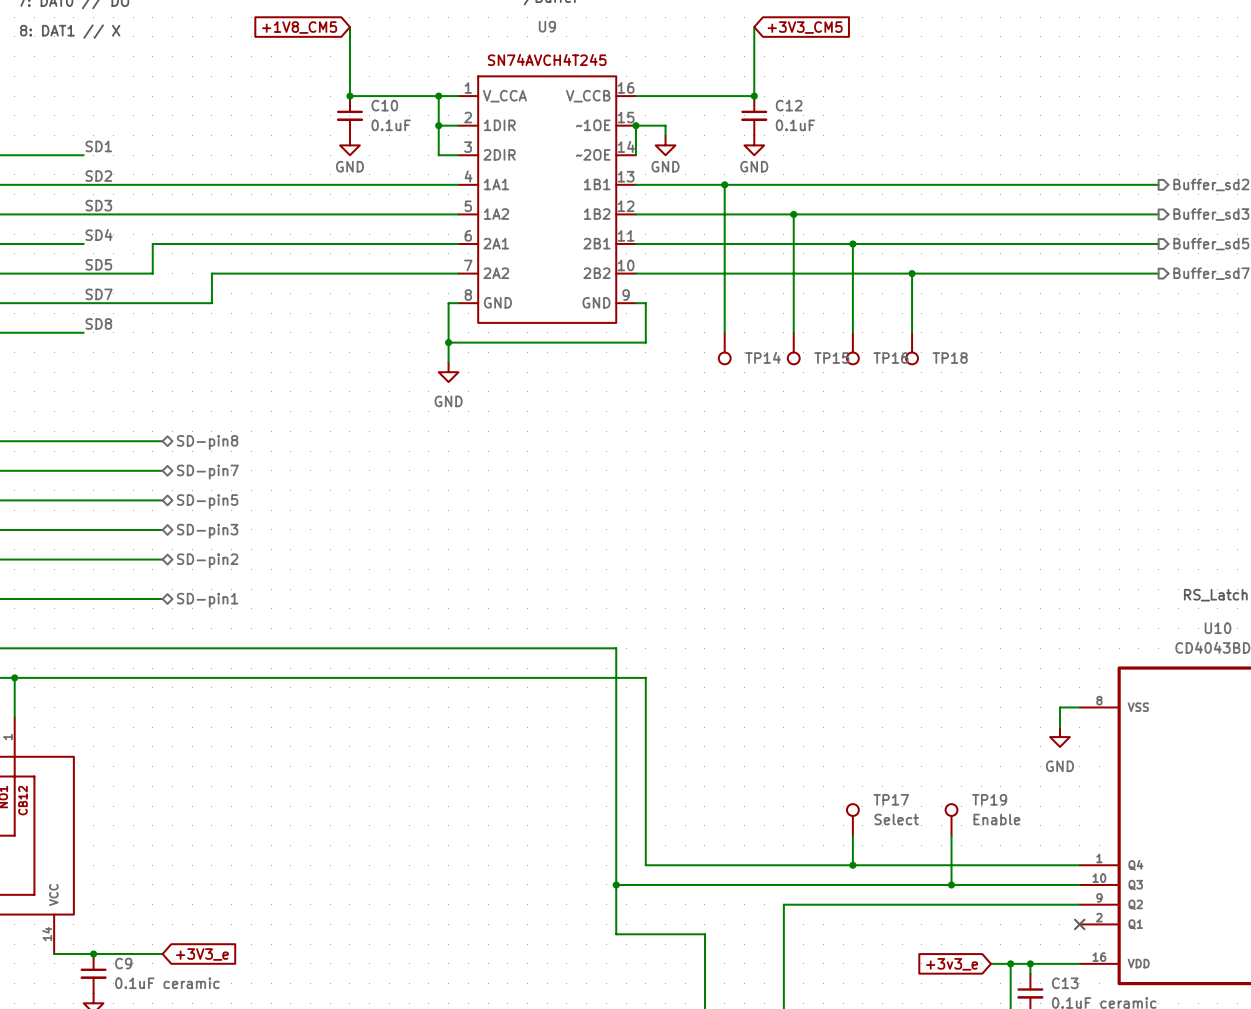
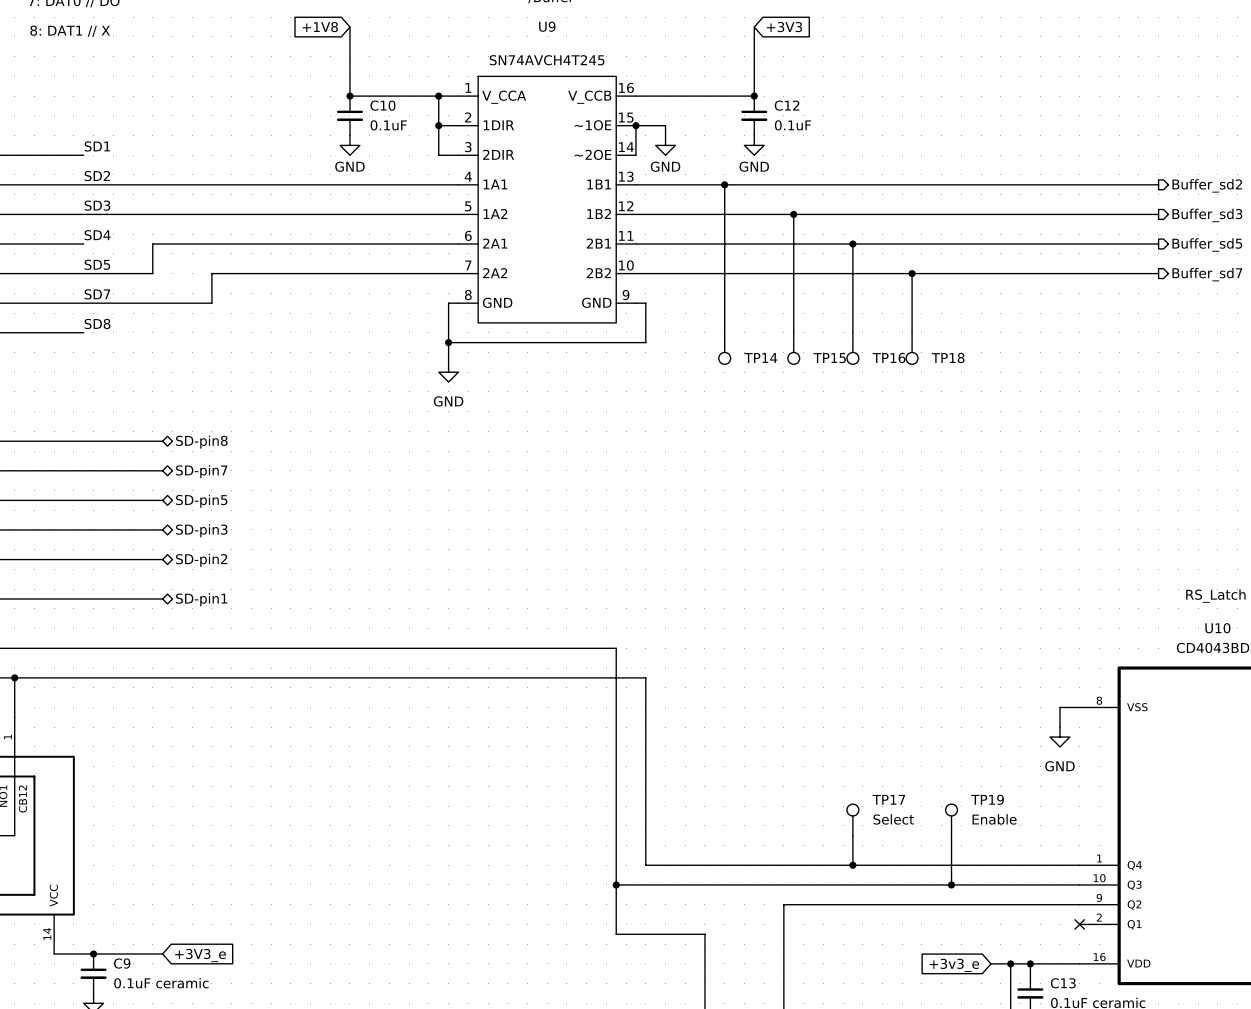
global label: +1V8_CM5 (299, 27) -> +1V8 (320, 27)
global label: +3V3_CM5 (805, 27) -> +3V3 (784, 27)

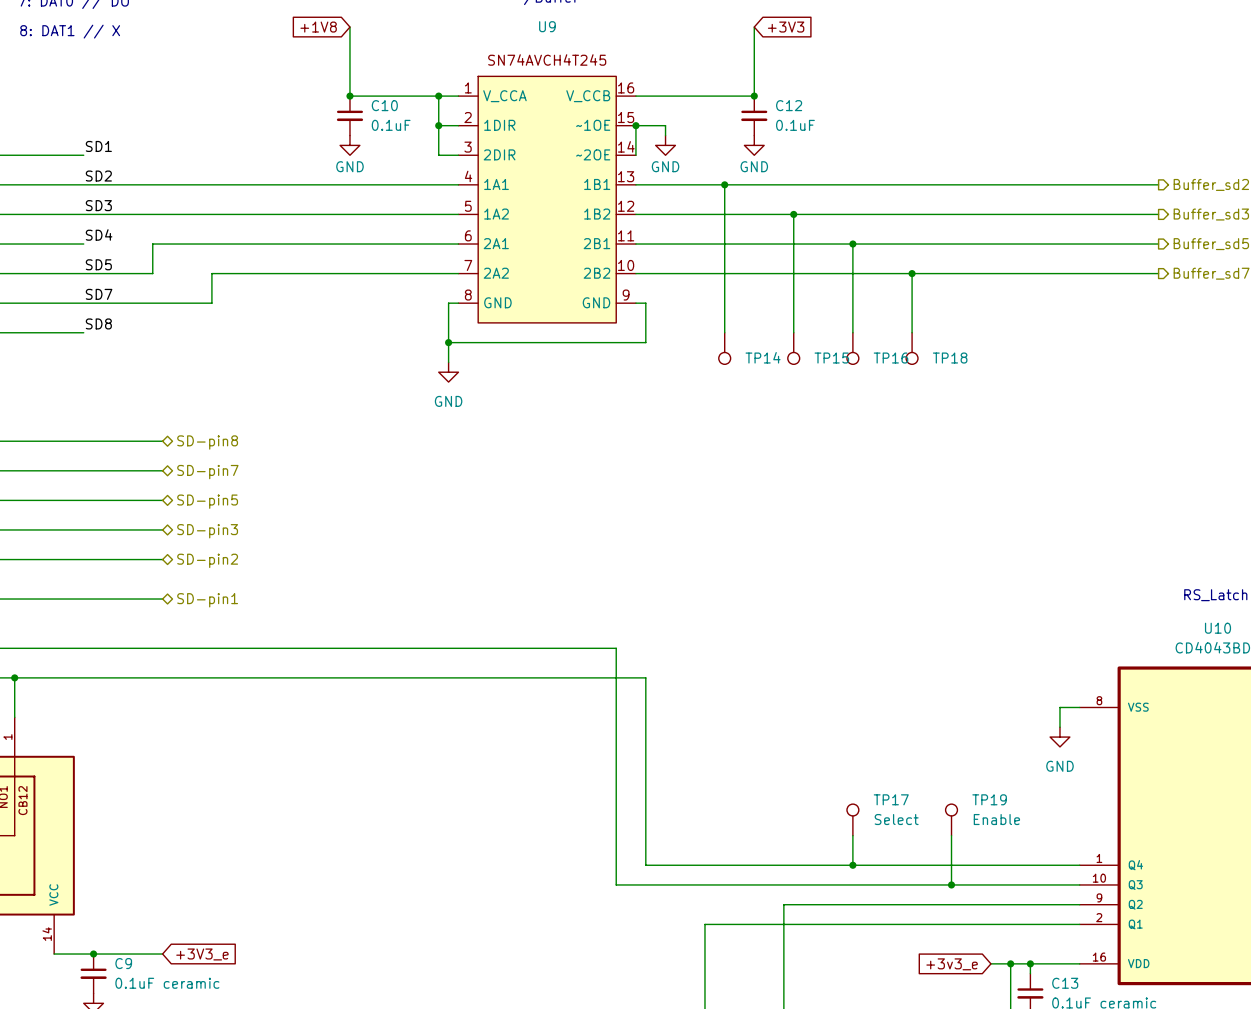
wire: (616, 884) (616, 934) (704, 934) -> (1079, 924) (704, 924) (704, 934)
junction: (616, 884) -> none
no-connect mark: (1079, 924) -> none

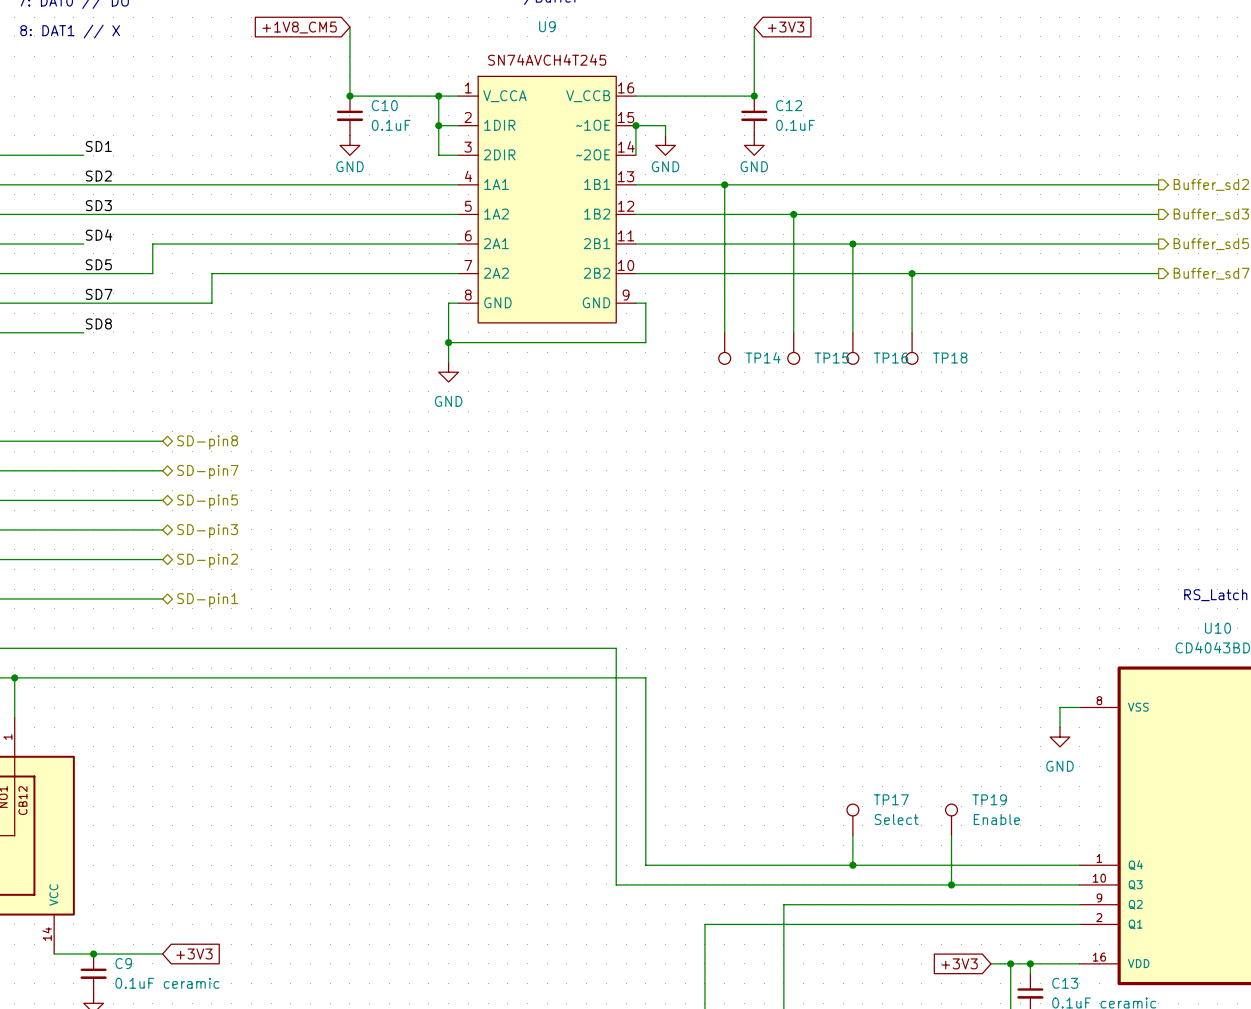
global label: +1V8 (318, 27) -> +1V8_CM5 (299, 27)
global label: +3V3_e (202, 954) -> +3V3 (194, 954)
global label: +3v3_e (952, 964) -> +3V3 (959, 963)

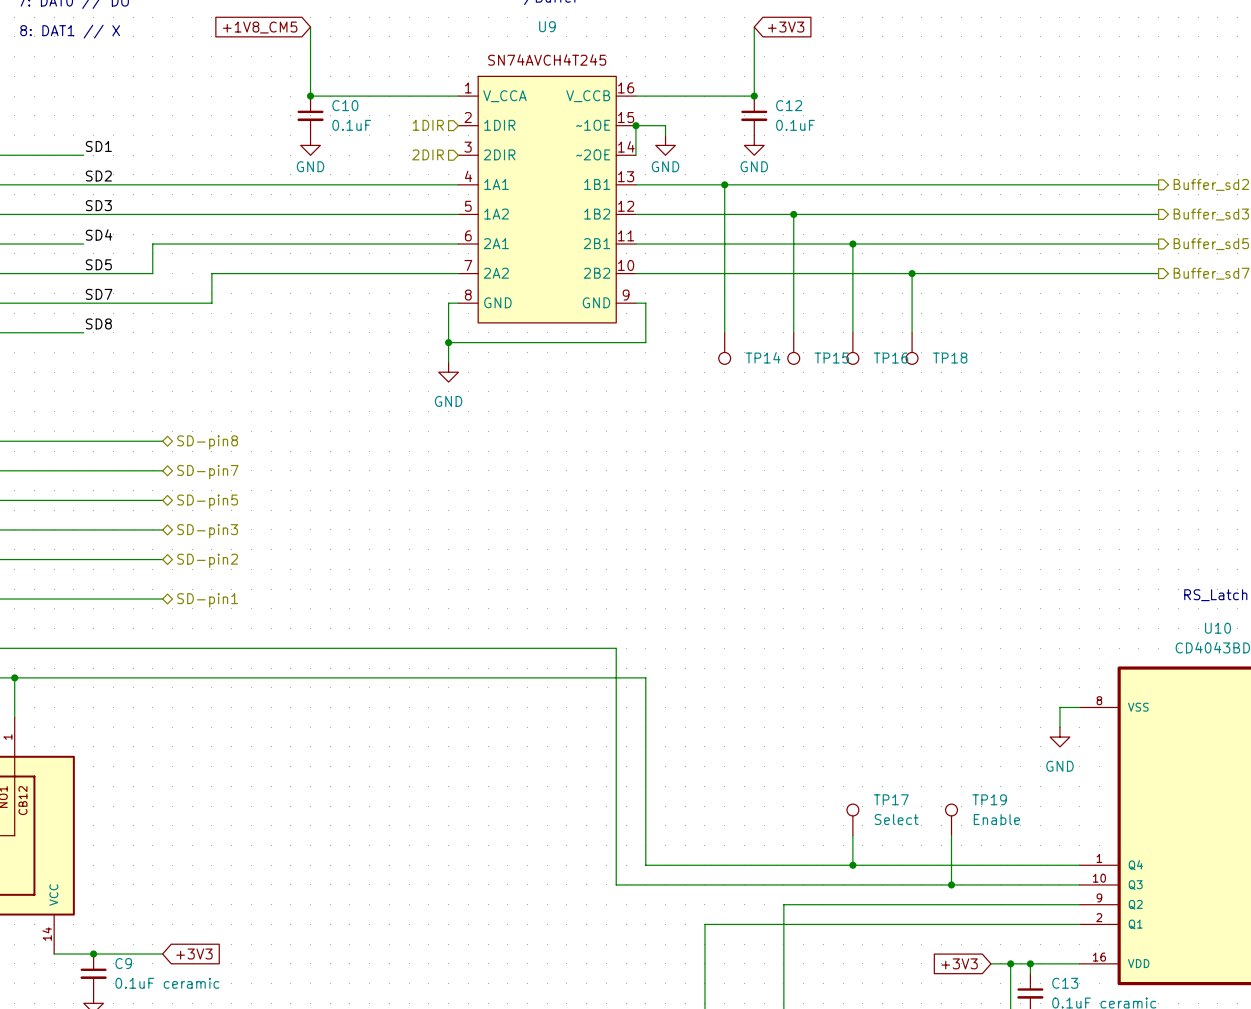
global label position: +1V8_CM5 (299, 27) -> +1V8_CM5 (260, 27)
wire: (349, 27) (349, 96) -> (310, 27) (310, 96) (349, 96)
junction position: (349, 96) -> (310, 96)
wire: (438, 96) (438, 155) (458, 155) -> none
junction: (438, 96) -> none
C10 position: (349, 115) -> (310, 115)
hierarchical label: none -> 1DIR (428, 125)
wire: (438, 125) (458, 125) -> none
junction: (438, 125) -> none
power symbol position: GND (349, 145) -> GND (310, 145)
hierarchical label: none -> 2DIR (428, 154)

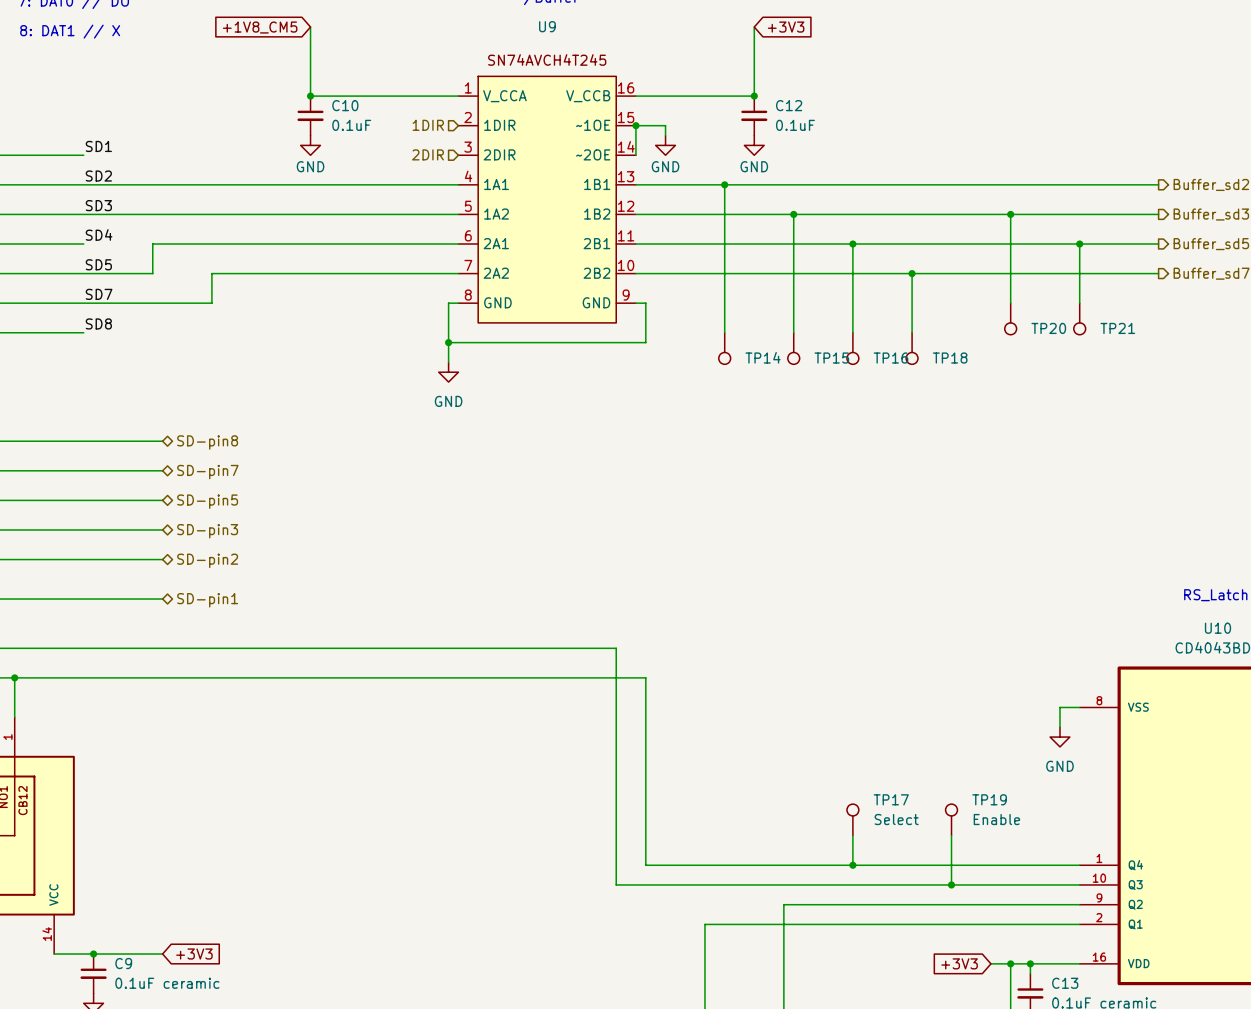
wire: none -> (1010, 214) (1010, 303)
junction: none -> (1010, 214)
wire: none -> (1079, 244) (1079, 303)
junction: none -> (1079, 244)
TP20: none -> (1010, 318)
TP21: none -> (1079, 318)

